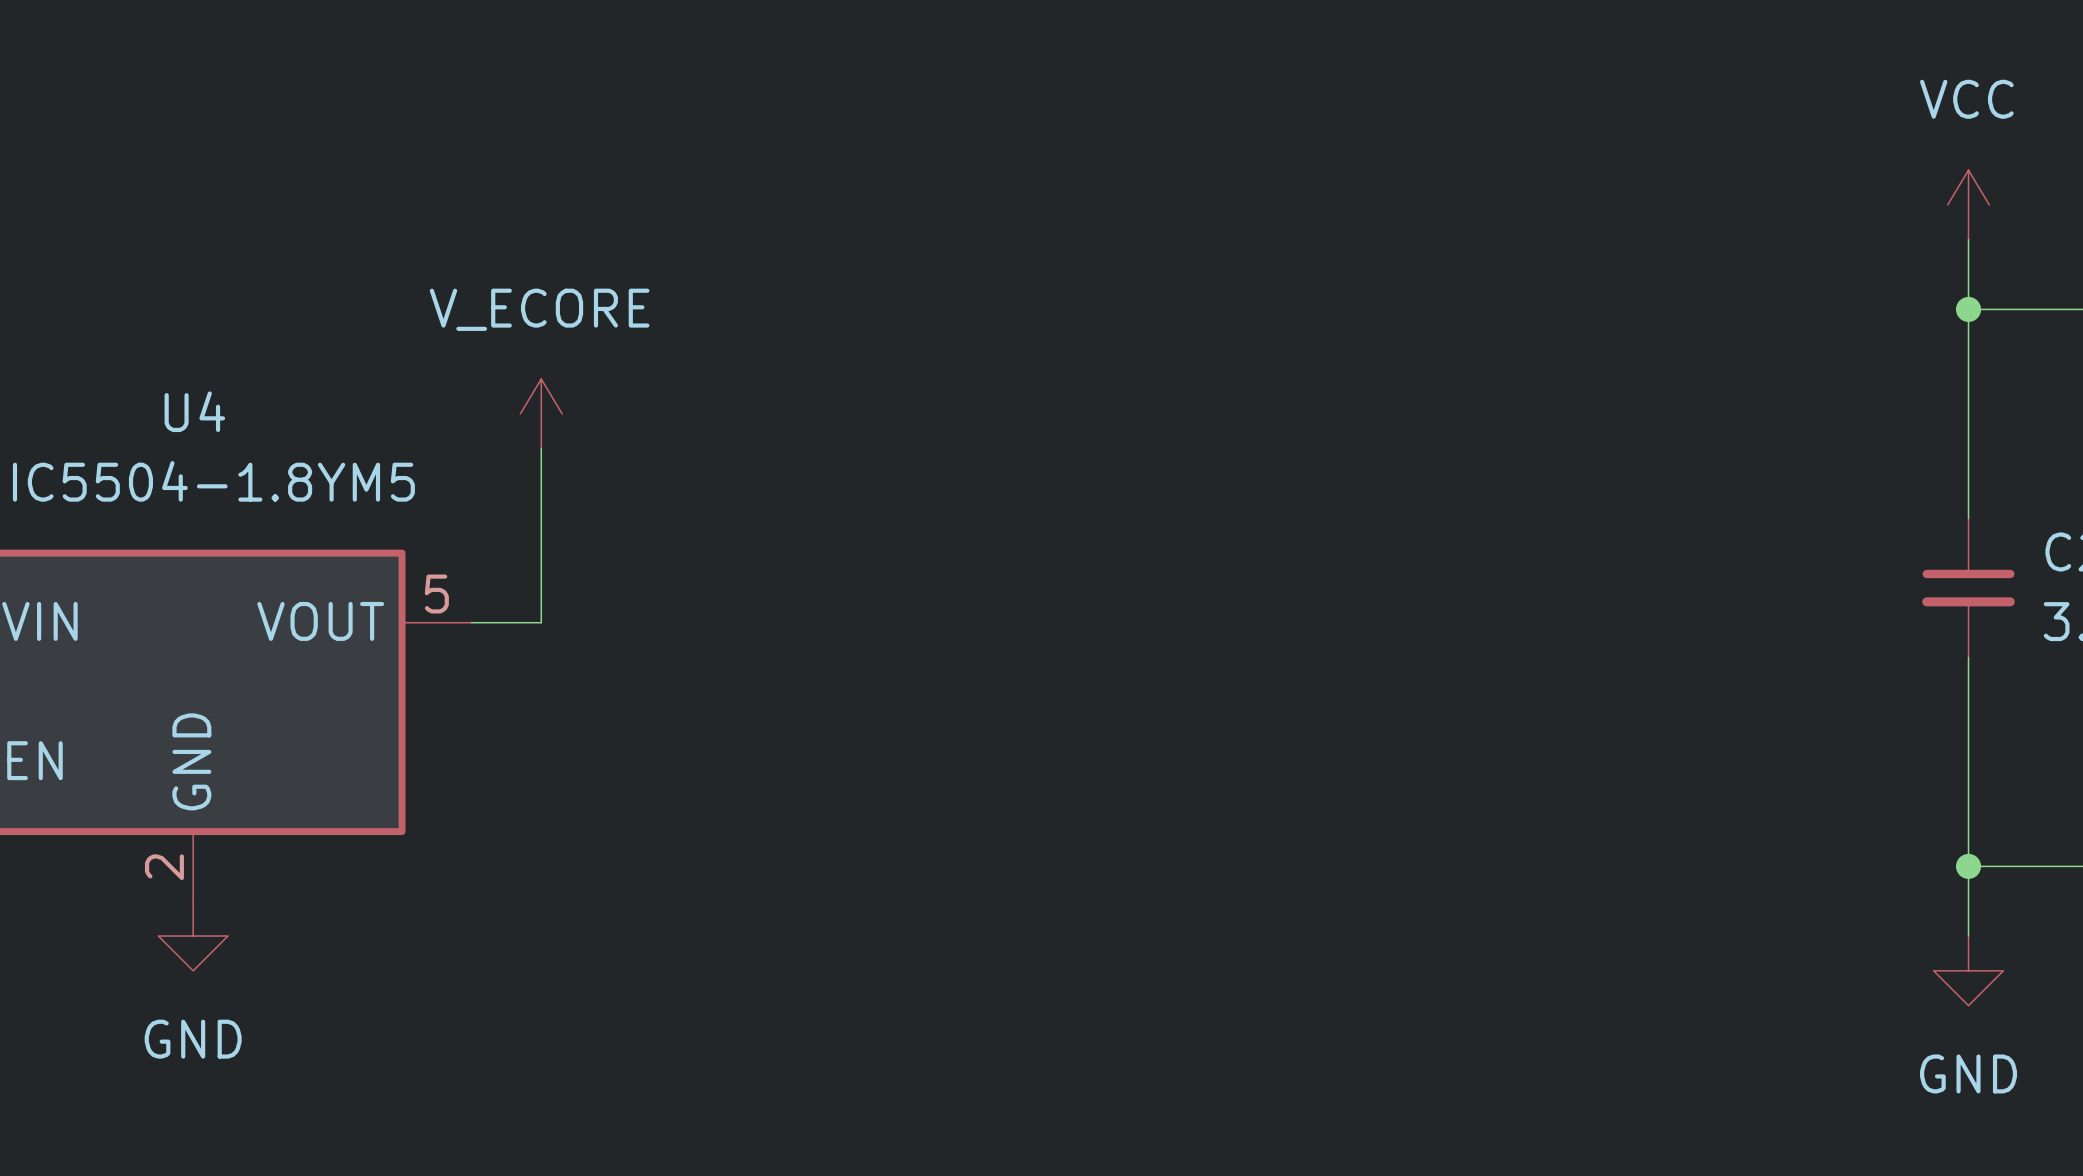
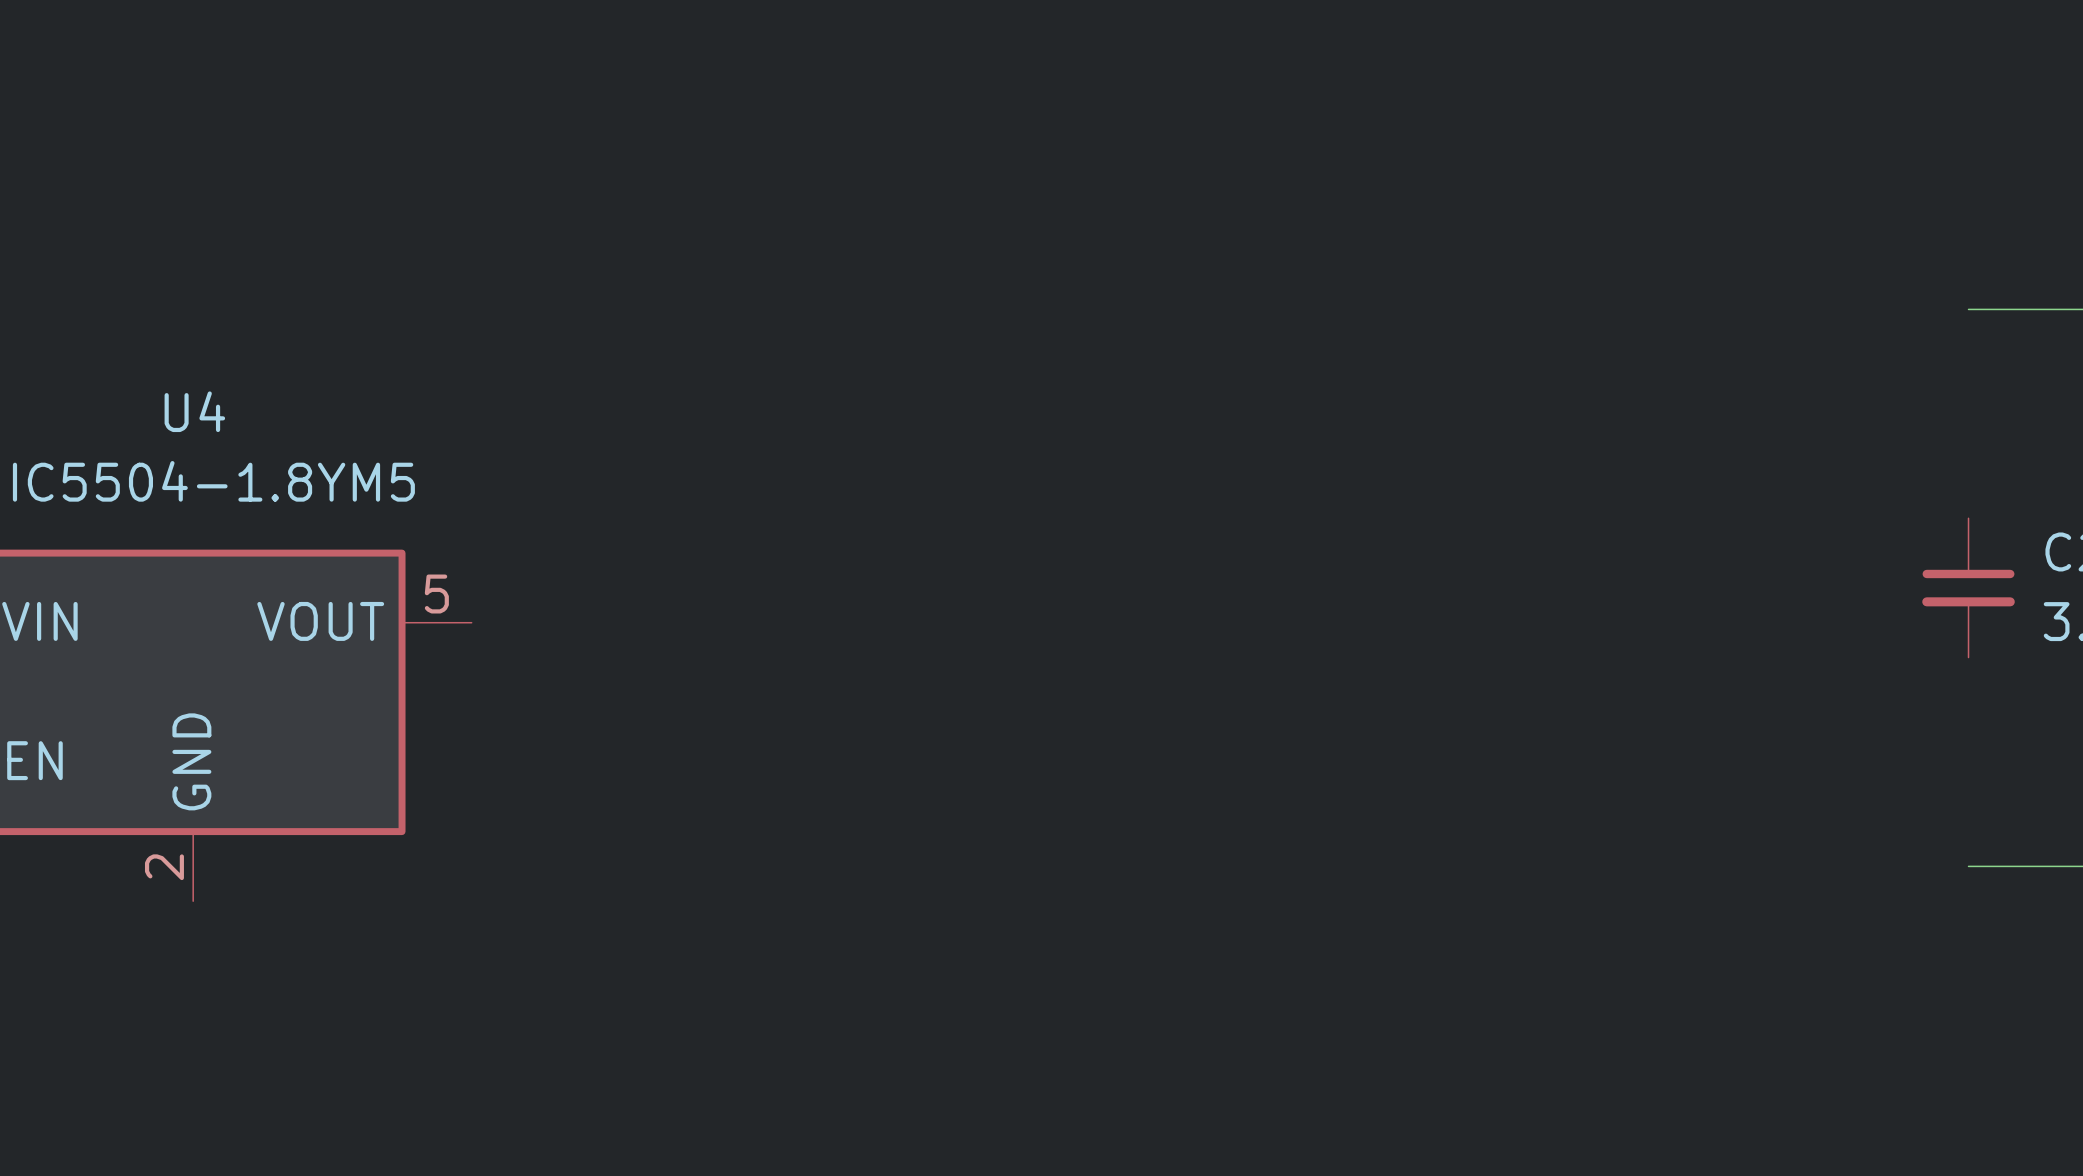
power symbol: VCC (1968, 204) -> none
wire: (1968, 239) (1968, 518) -> none
junction: (1968, 309) -> none
power symbol: V_ECORE (541, 413) -> none
wire: (541, 448) (541, 622) (471, 622) -> none
wire: (1968, 657) (1968, 936) -> none
junction: (1968, 866) -> none
power symbol: GND (193, 936) -> none
power symbol: GND (1968, 970) -> none

